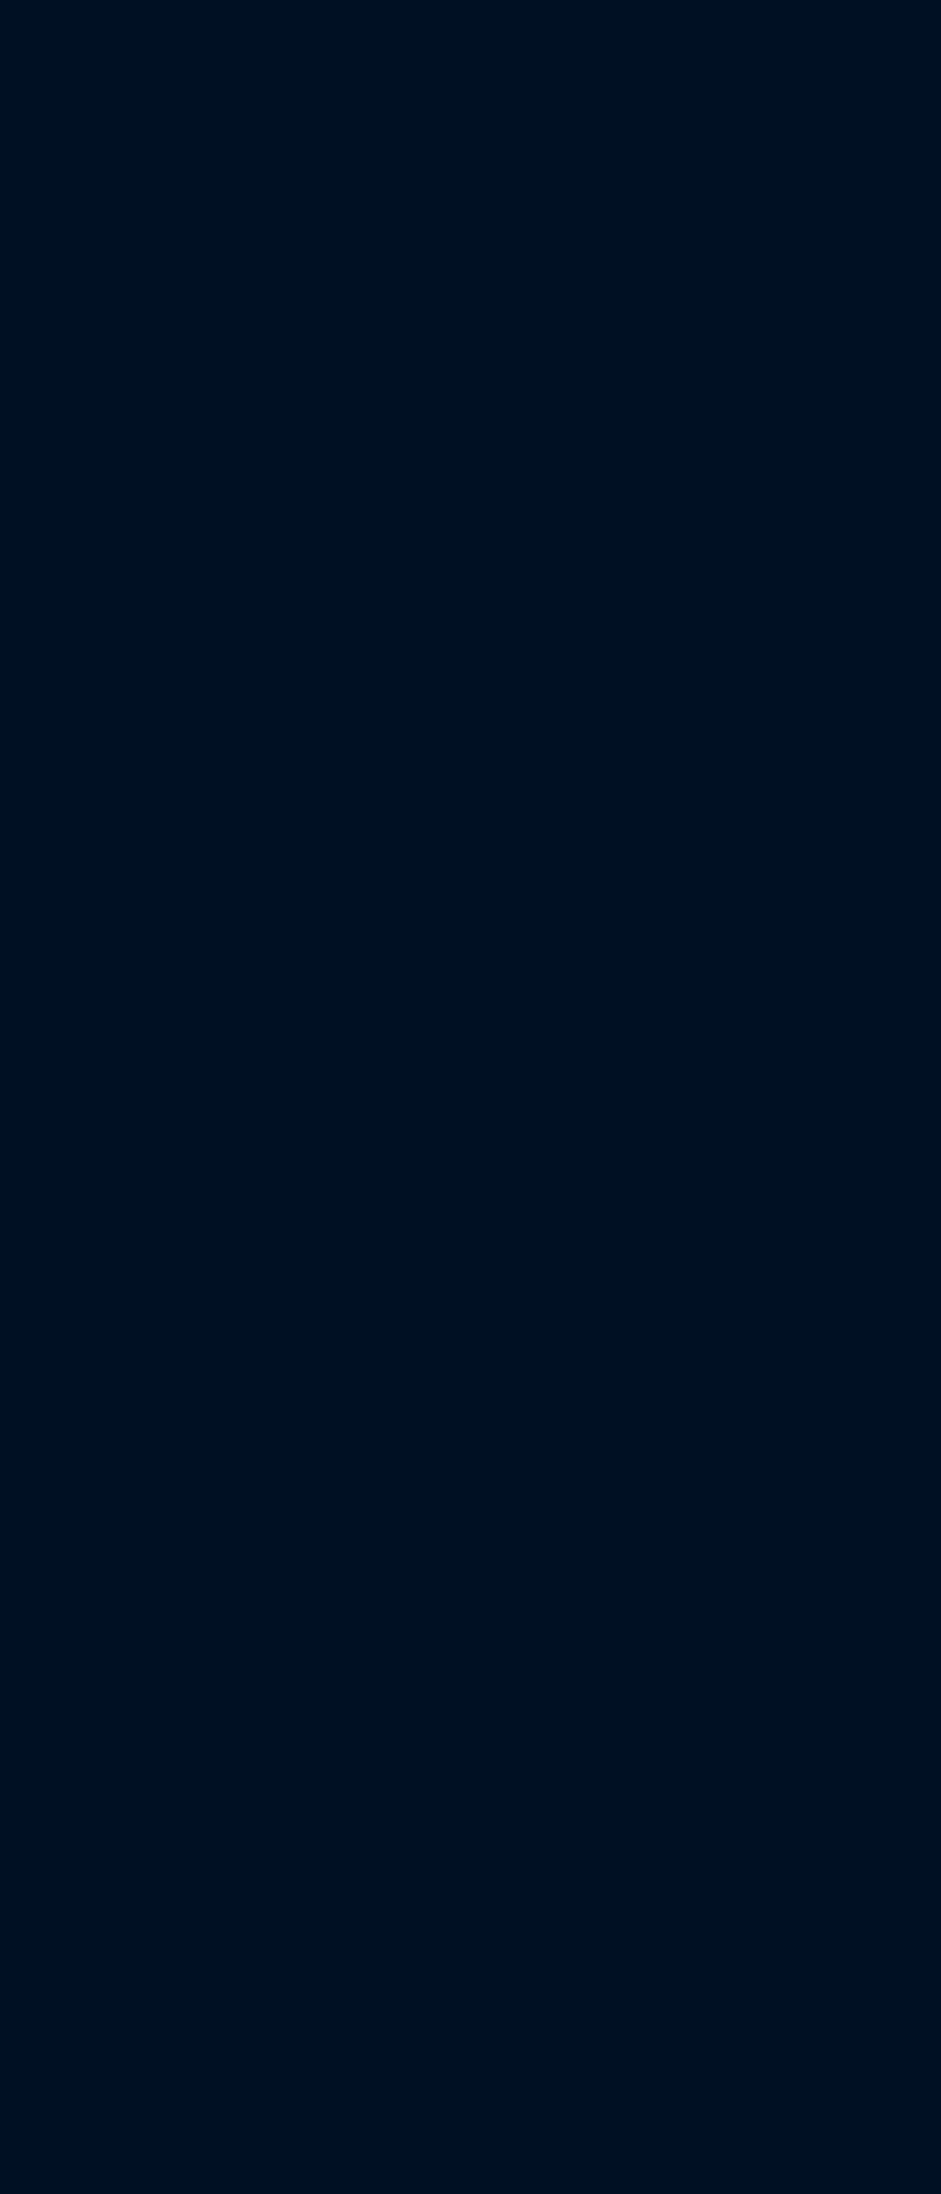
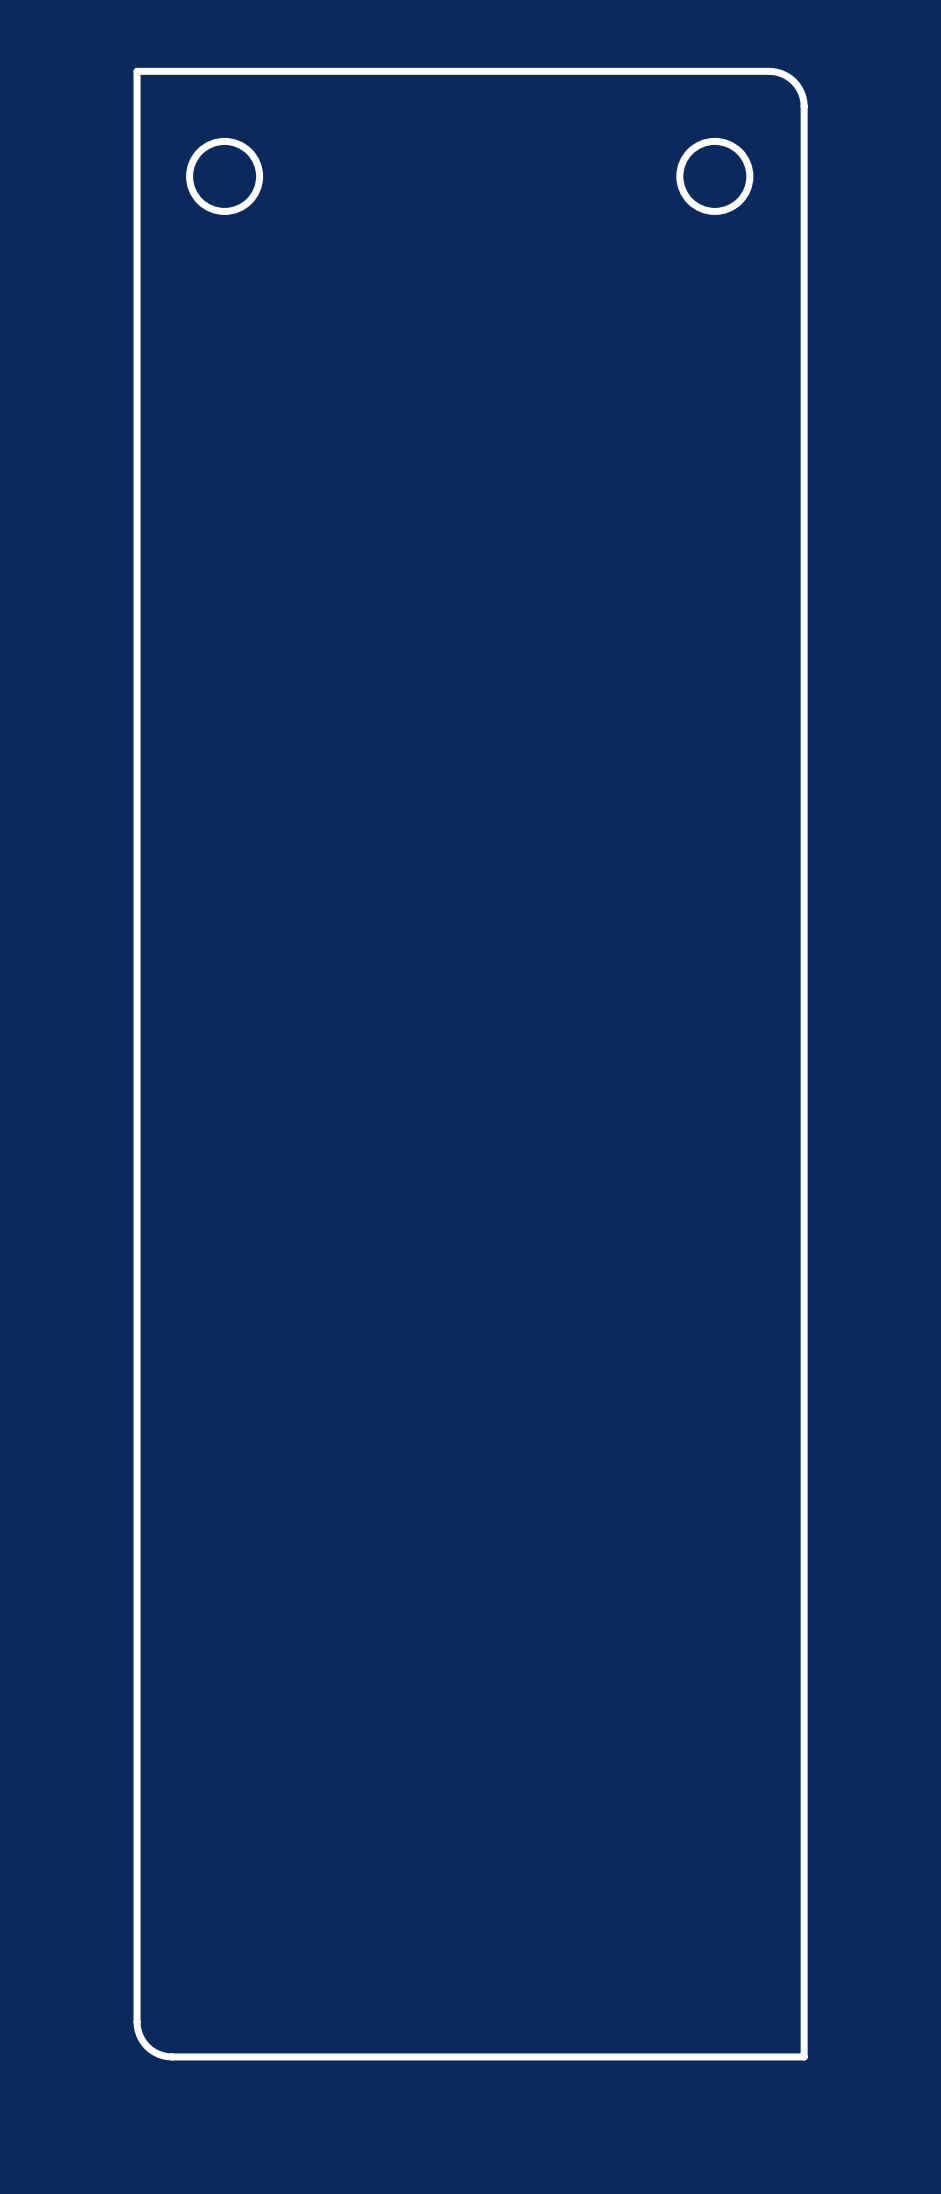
line: none -> (137, 71) (138, 2030) (144, 2043) (150, 2049) (162, 2055) (172, 2056) (804, 2056) (802, 97) (796, 85) (790, 78) (782, 74) (769, 71) (137, 71)
drawing: none -> [186, 137, 264, 215]
drawing: none -> [676, 137, 754, 215]

